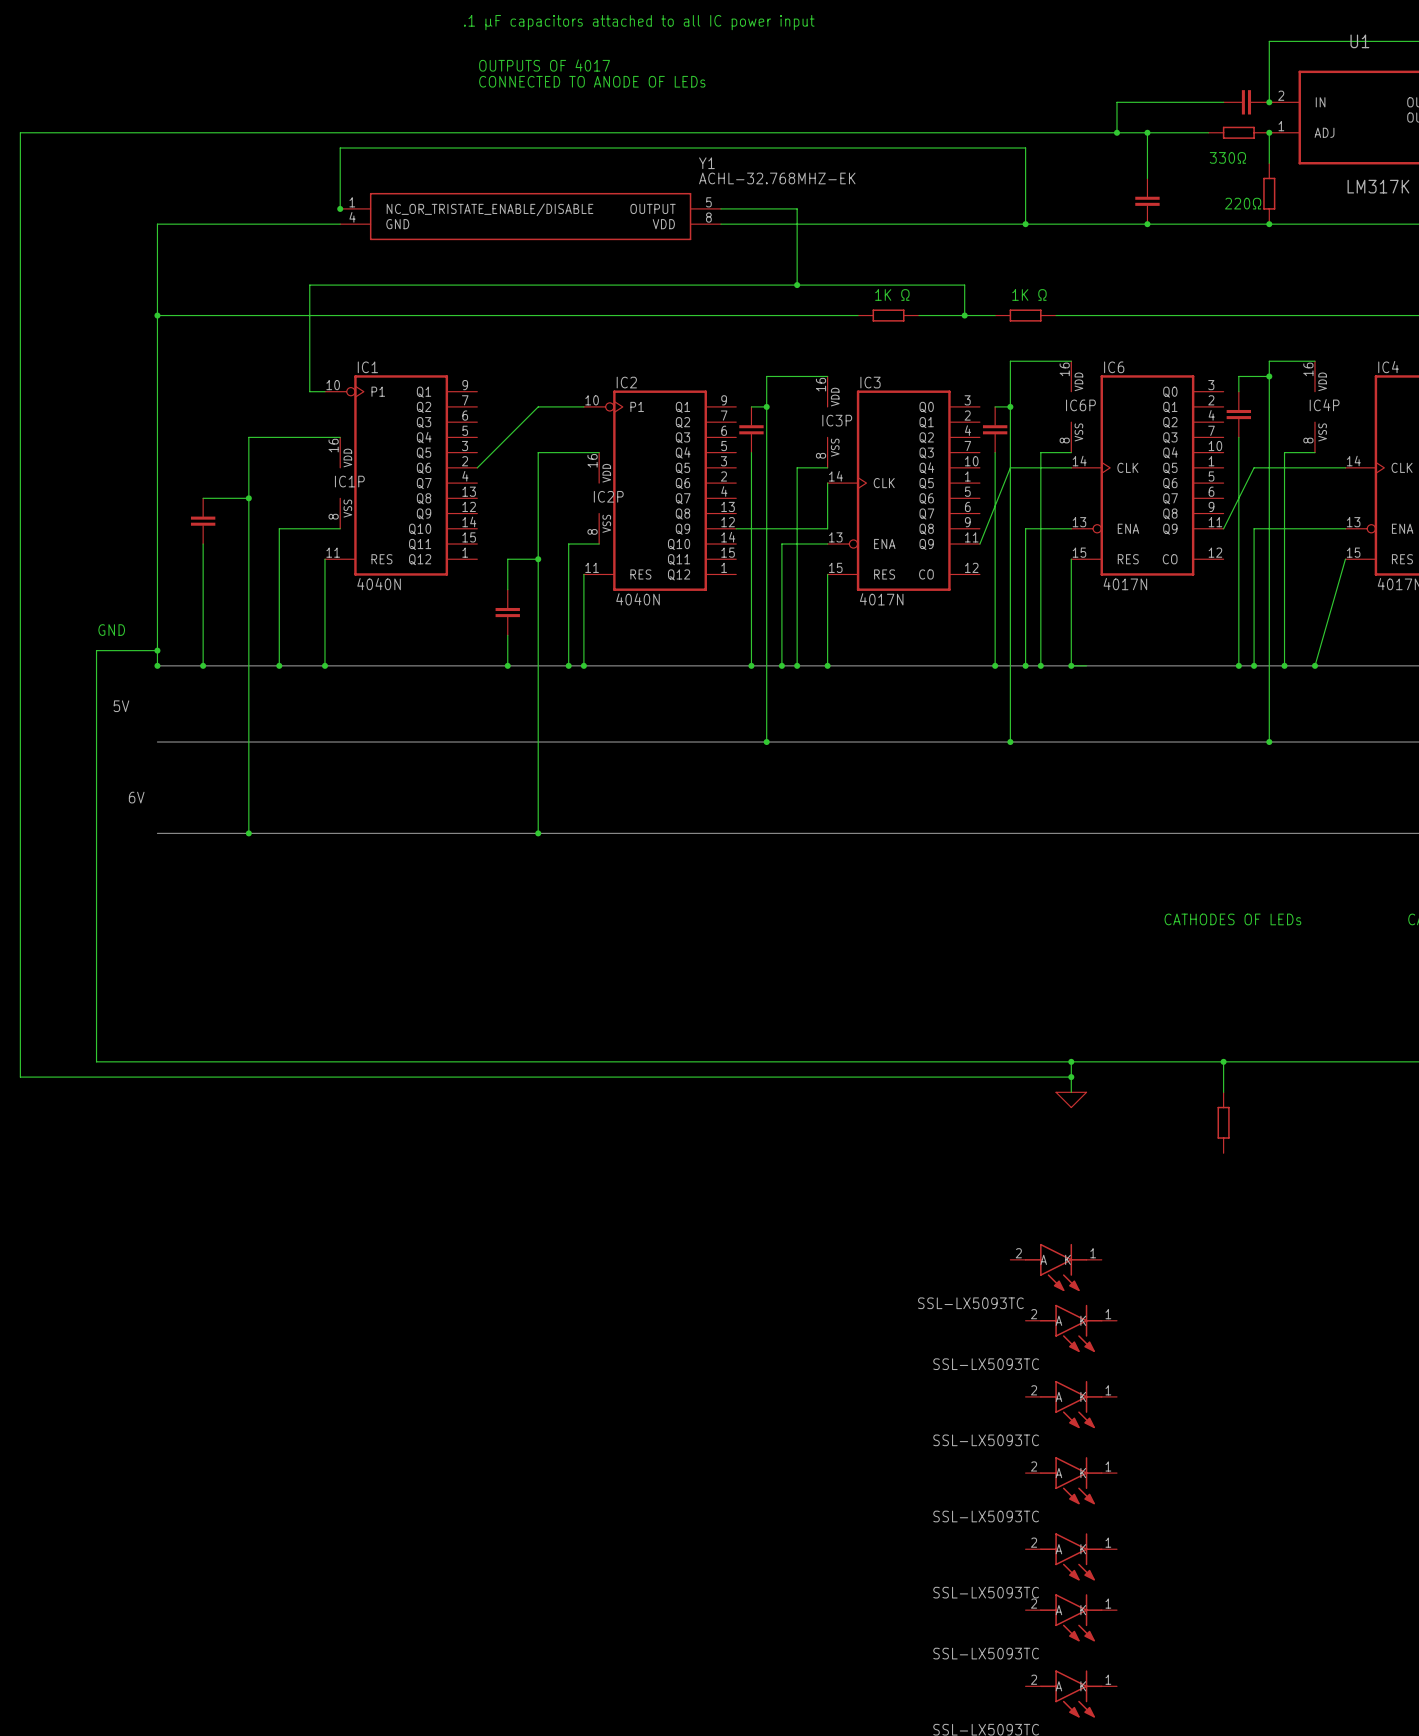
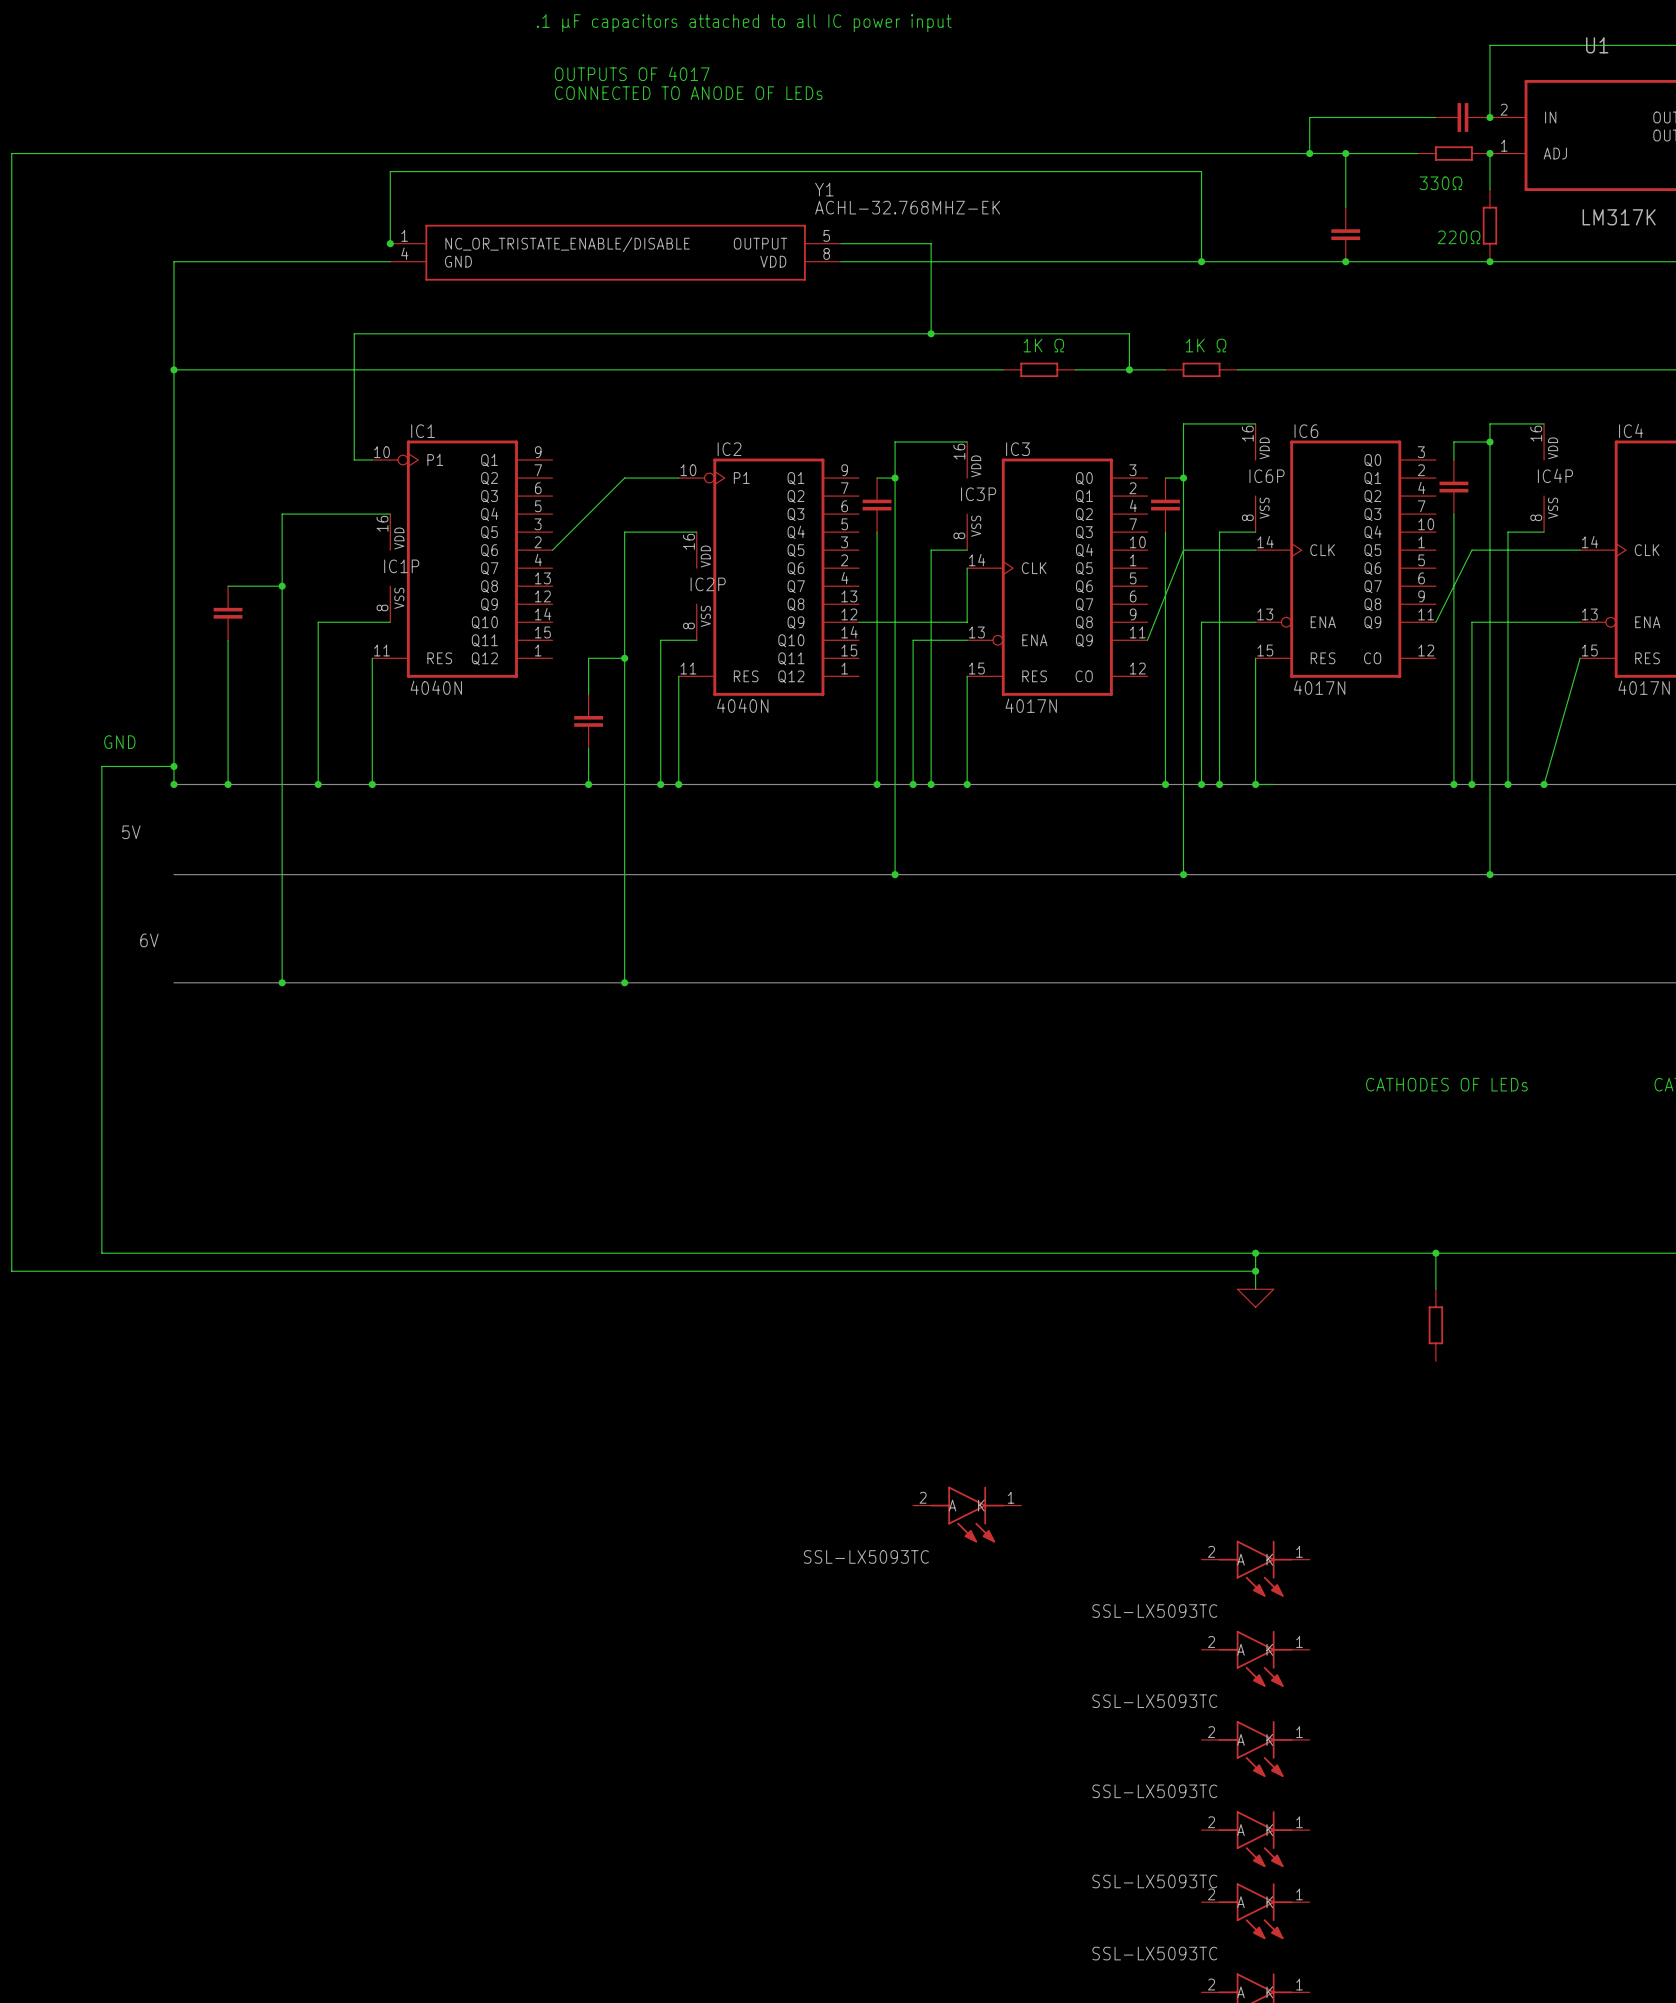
part: SSL-LX5093TC (1056, 1267) -> none
part: none -> SSL-LX5093TC (967, 1514)

